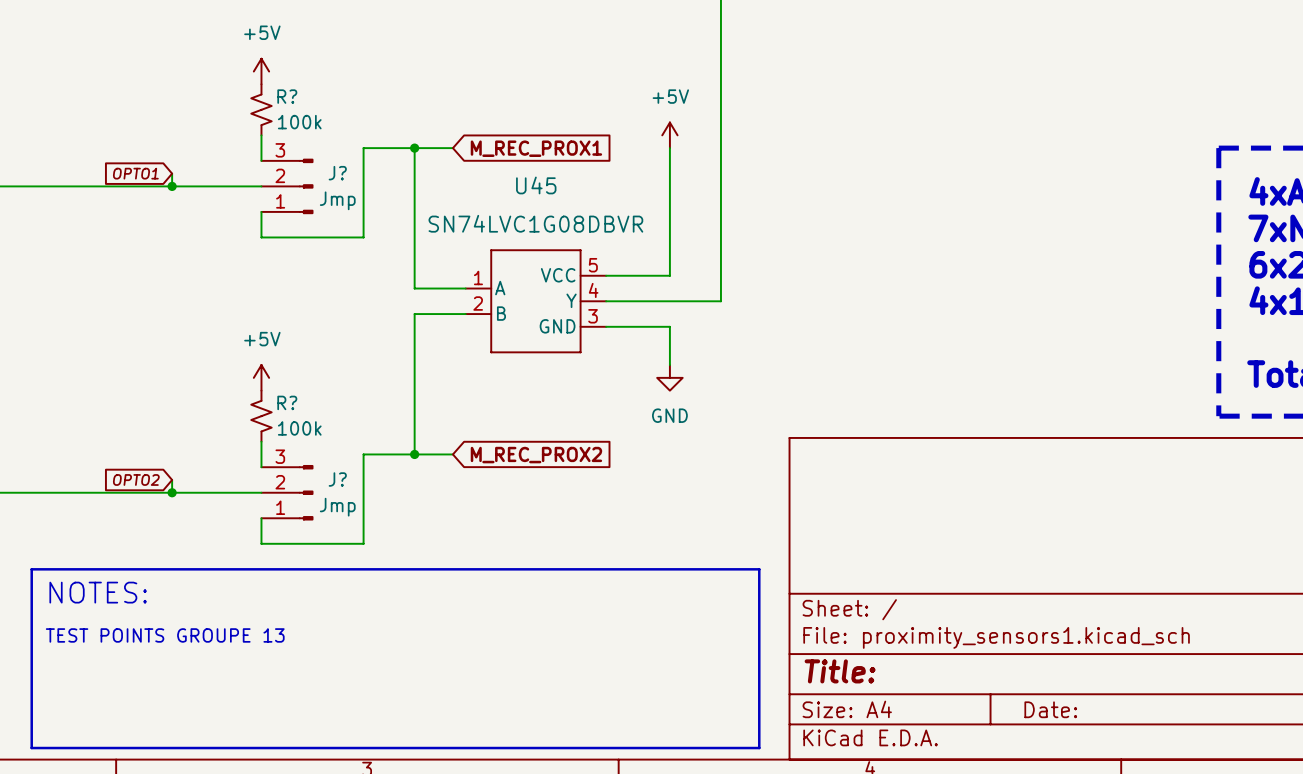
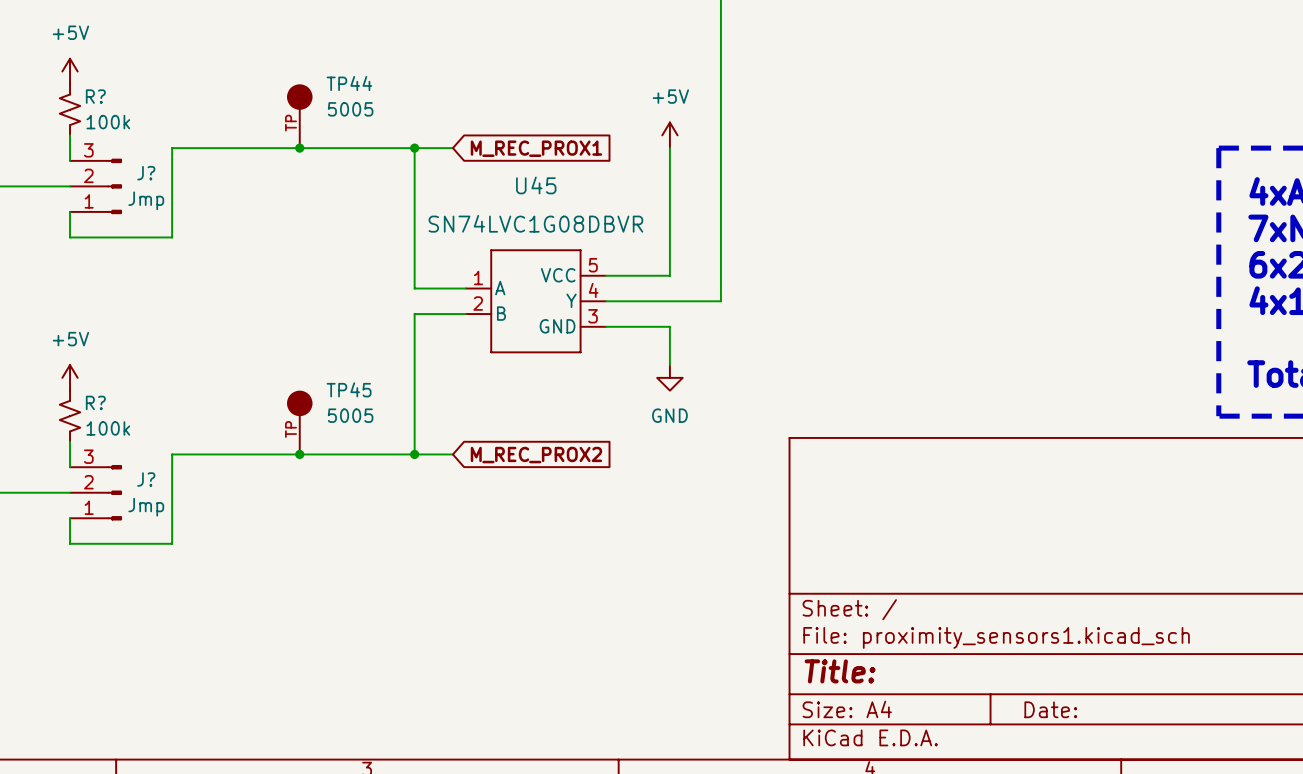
power symbol: none -> +5V (70, 71)
power symbol: +5V (261, 71) -> none
R?: none -> 100k (70, 109)
R?: 100k (261, 109) -> none
TP44: none -> 5005 (299, 116)
wire: (261, 135) (261, 160) -> (70, 135) (70, 160)
junction: none -> (299, 148)
wire: (363, 148) (363, 237) (261, 237) (261, 211) -> (363, 148) (172, 148) (172, 173)
global label: OPTO1 (135, 173) -> none
wire: (70, 186) (261, 186) -> none
J?: none -> Jmp (95, 186)
wire: none -> (172, 186) (172, 237) (70, 237) (70, 211)
junction: (172, 186) -> none
J?: Jmp (287, 186) -> none
power symbol: none -> +5V (70, 377)
power symbol: +5V (261, 377) -> none
R?: none -> 100k (70, 416)
R?: 100k (261, 416) -> none
TP45: none -> 5005 (299, 422)
wire: (261, 441) (261, 467) -> (70, 441) (70, 467)
junction: none -> (299, 454)
wire: (363, 454) (363, 543) (261, 543) (261, 518) -> (363, 454) (172, 454) (172, 479)
global label: OPTO2 (136, 479) -> none
wire: (70, 492) (261, 492) -> none
J?: none -> Jmp (95, 492)
wire: none -> (172, 492) (172, 543) (70, 543) (70, 518)
junction: (172, 492) -> none
J?: Jmp (287, 492) -> none
line: (31, 569) (759, 569) (759, 748) (31, 748) (31, 569) -> none
text: NOTES: (98, 592) -> none
text: TEST POINTS GROUPE 13 (165, 635) -> none

